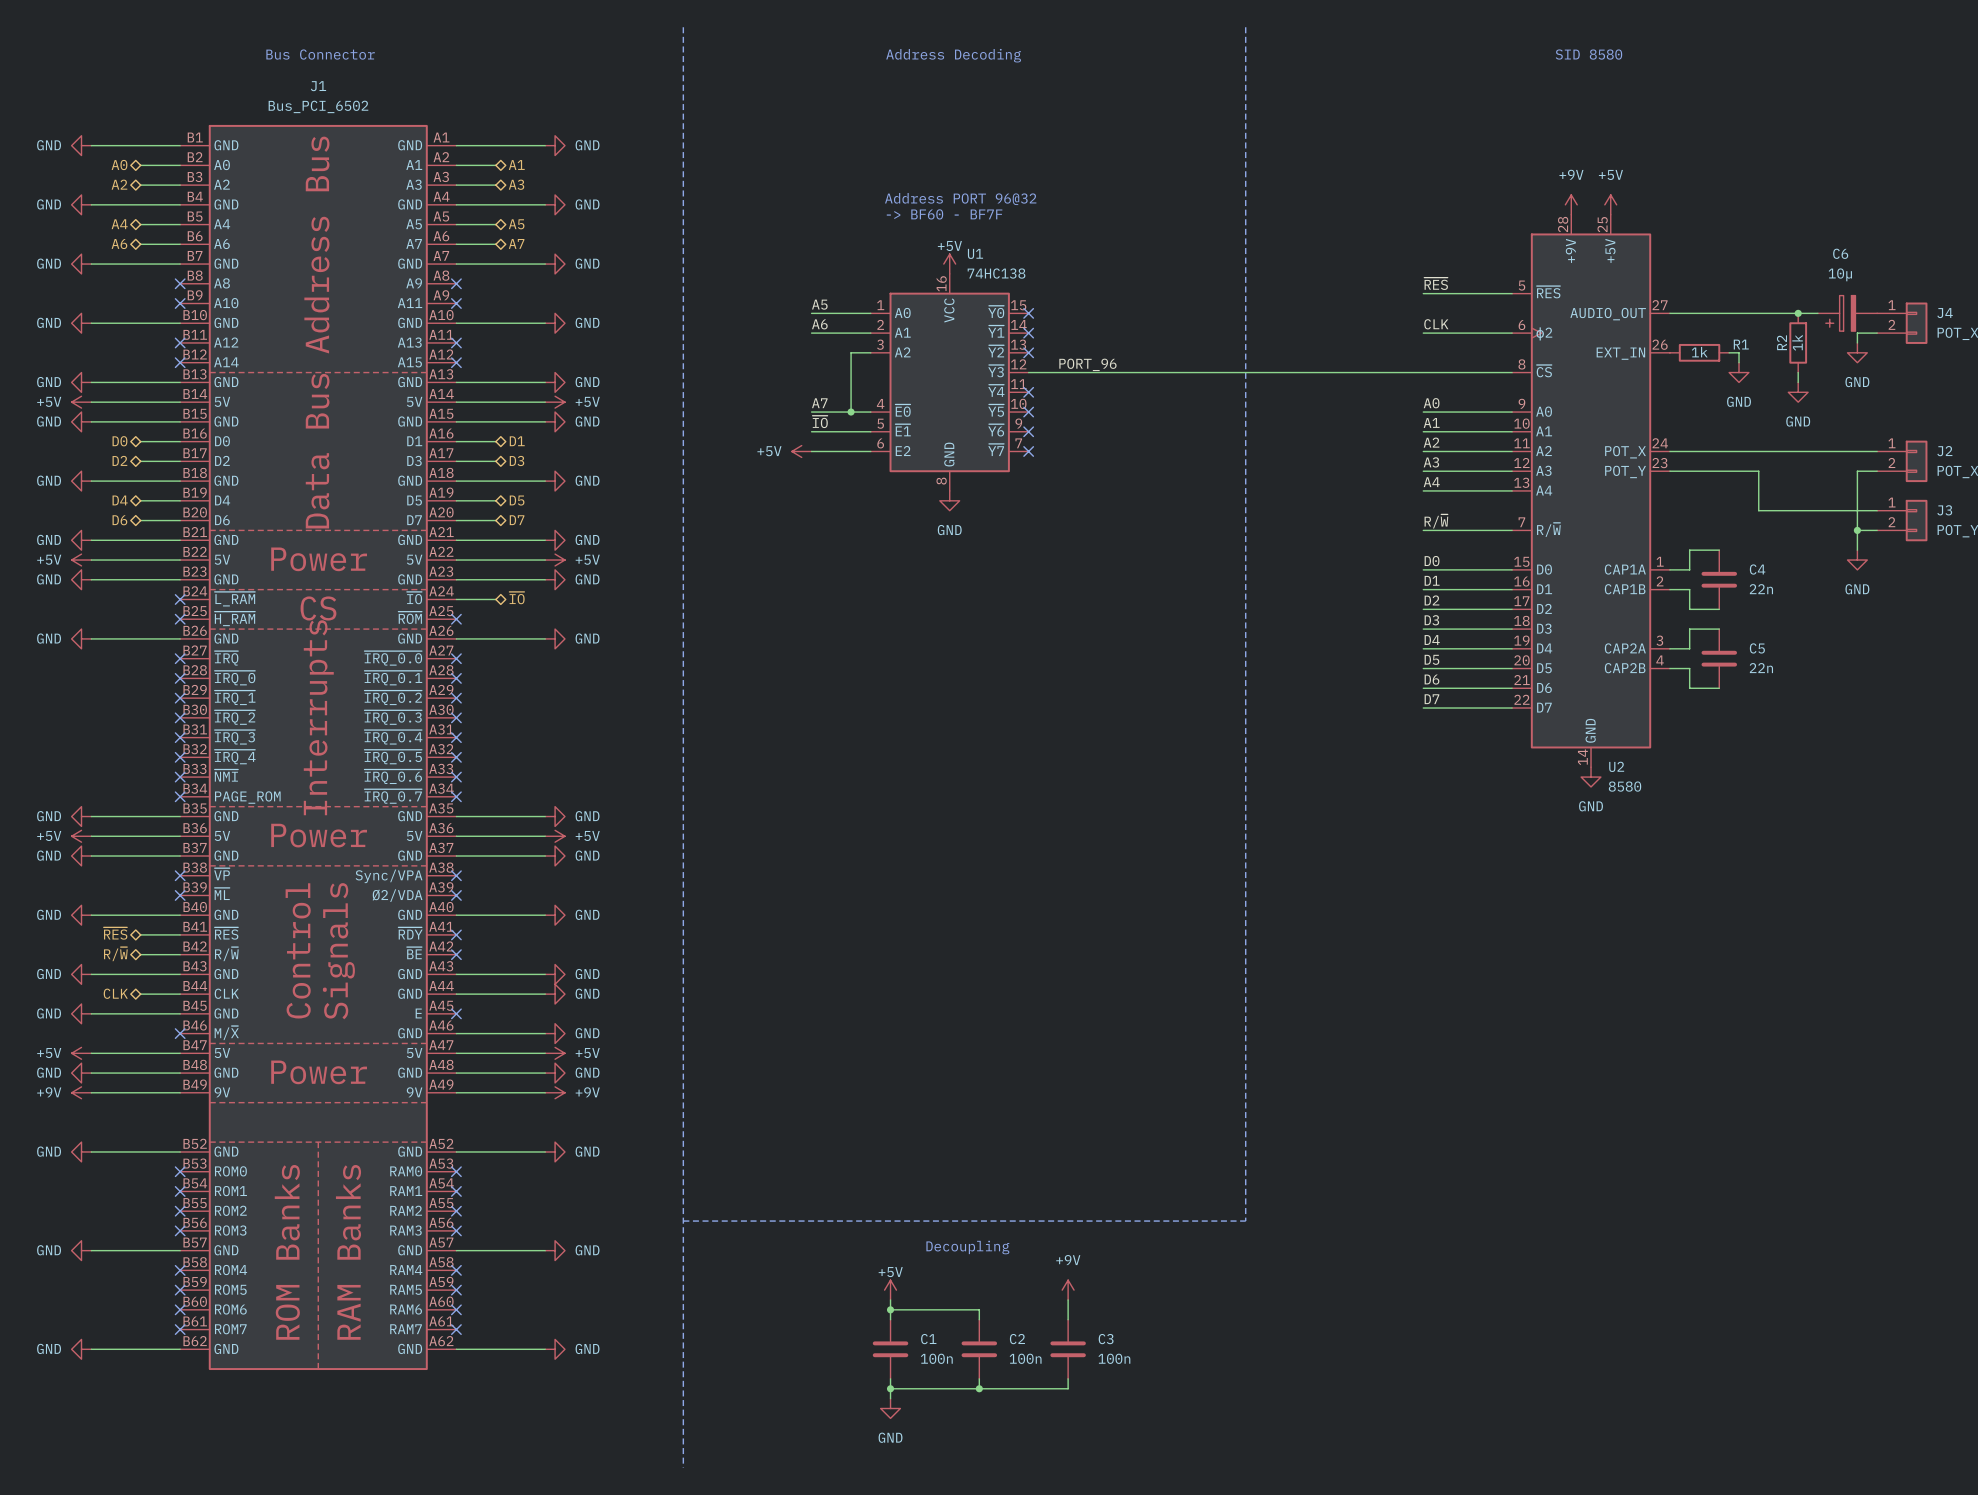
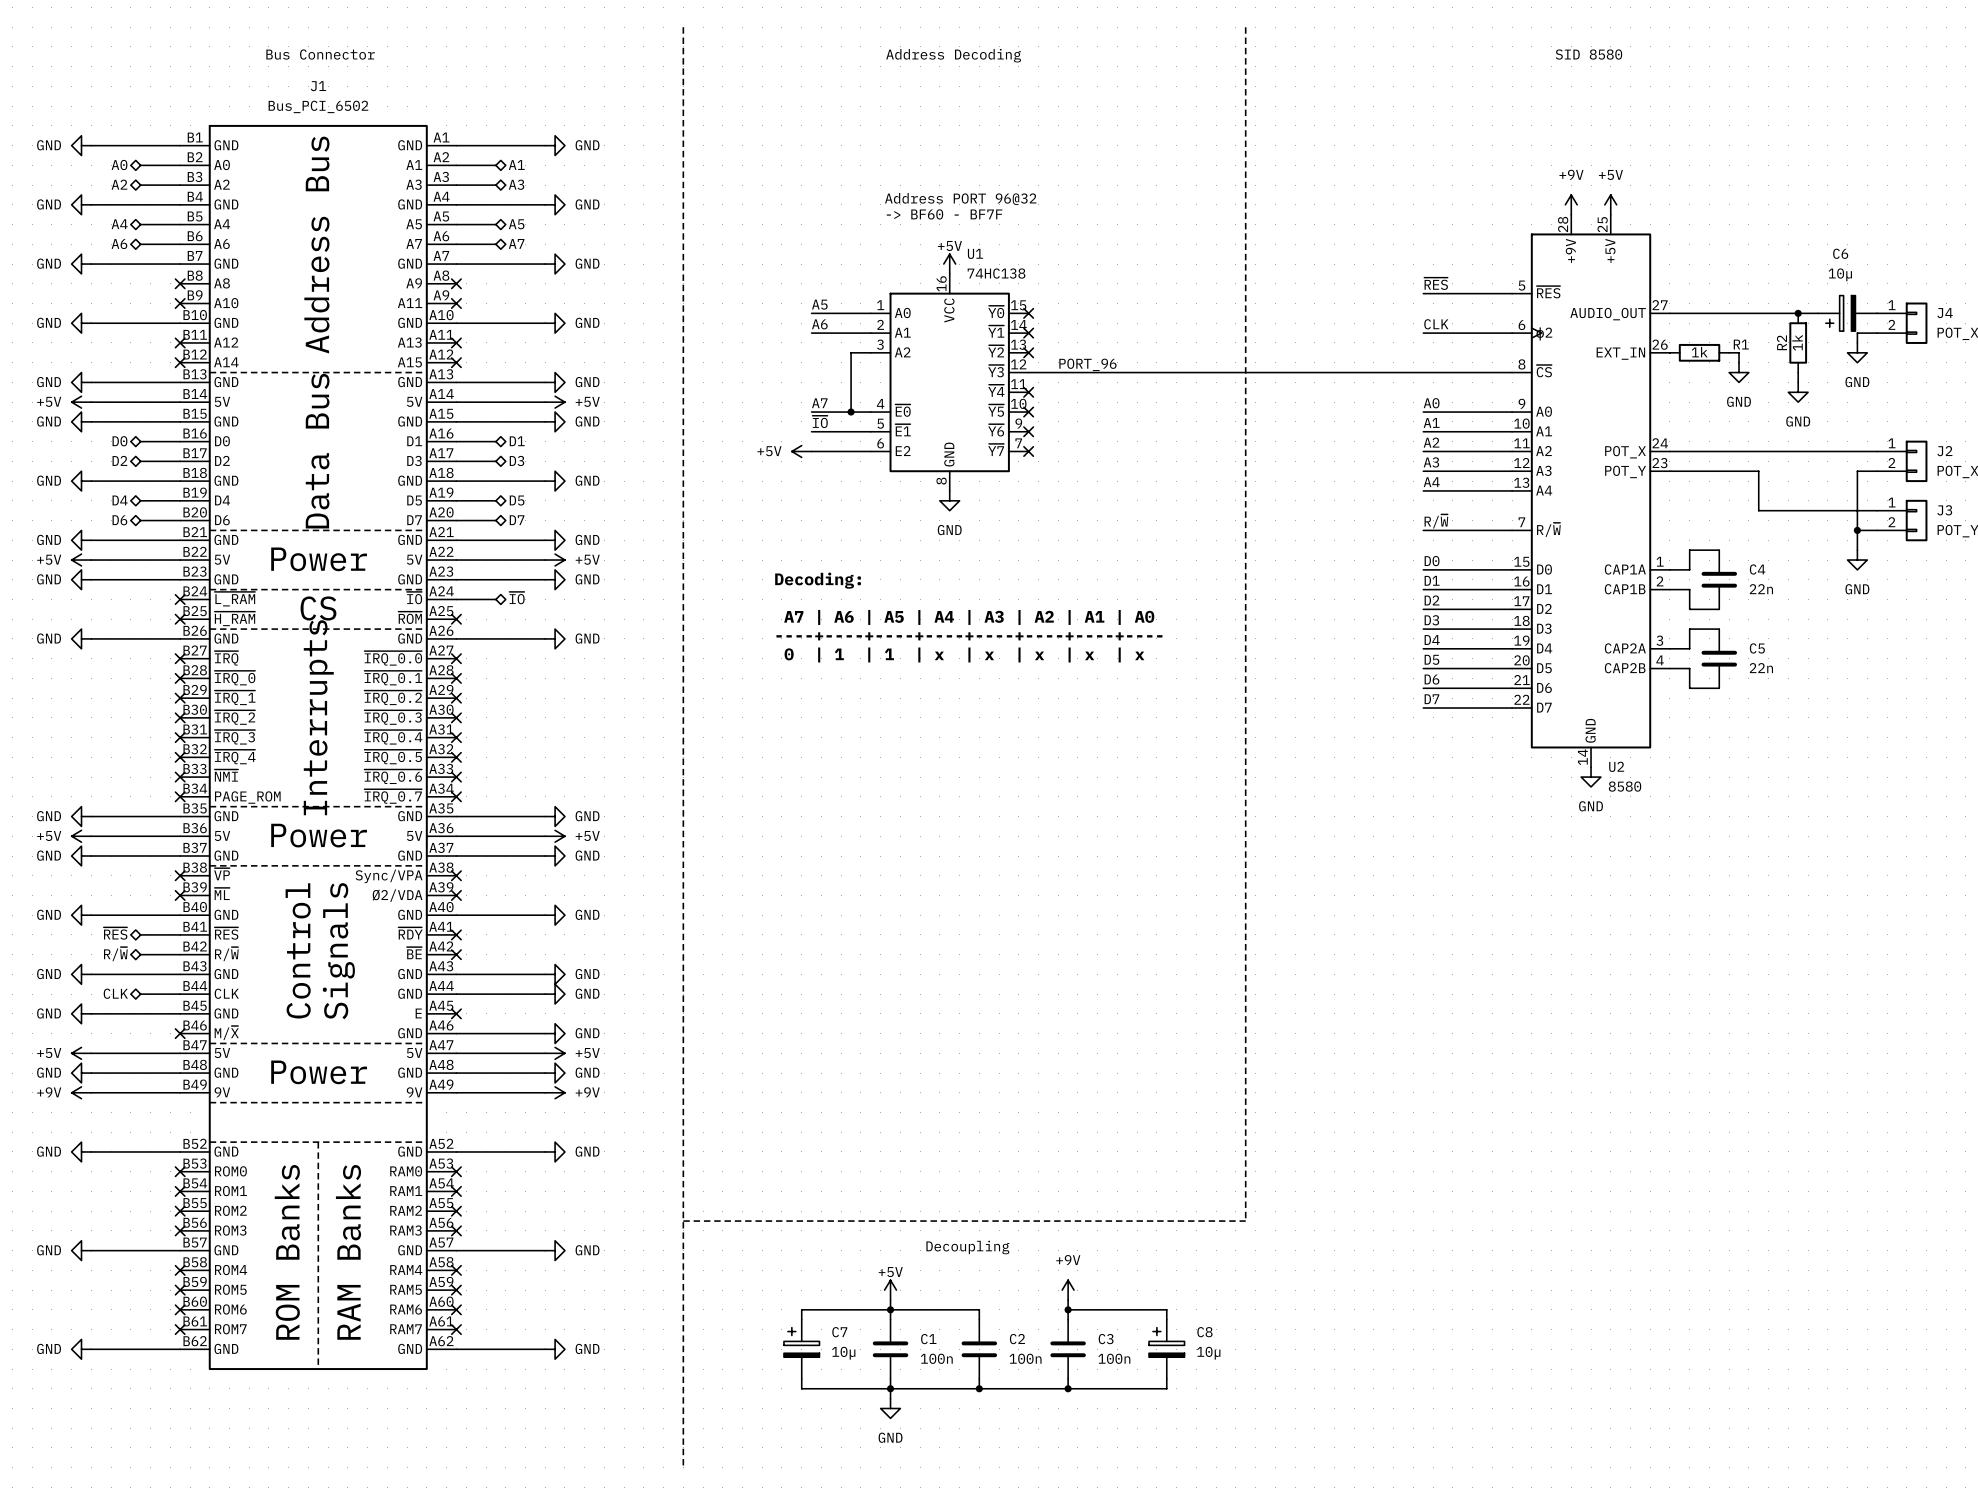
text: none -> Decoding: (818, 580)
text: none -> A7 | A6 | A5 | A4 | A3 | A2 | A1 | A0 (969, 617)
text: none -> ----+----+----+----+----+----+----+---- (969, 636)
text: none -> 0 | 1 | 1 | x | x | x | x | x (964, 654)
wire: none -> (890, 1309) (801, 1309) (801, 1319)
wire: none -> (1068, 1309) (1166, 1309) (1166, 1319)
junction: none -> (1068, 1309)
C7: none -> 10µ (801, 1349)
C8: none -> 10µ (1166, 1349)
wire: none -> (801, 1378) (801, 1388) (890, 1388)
wire: none -> (1166, 1378) (1166, 1388) (1068, 1388)
junction: none -> (1068, 1388)

